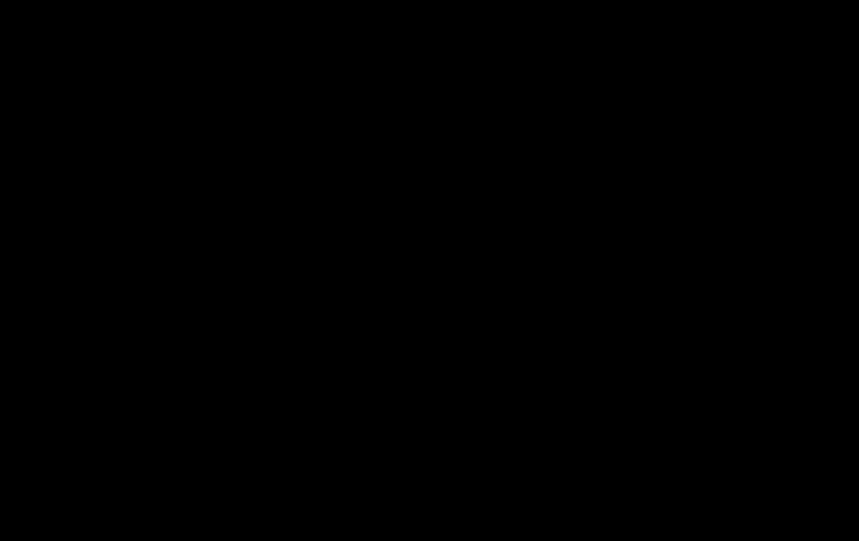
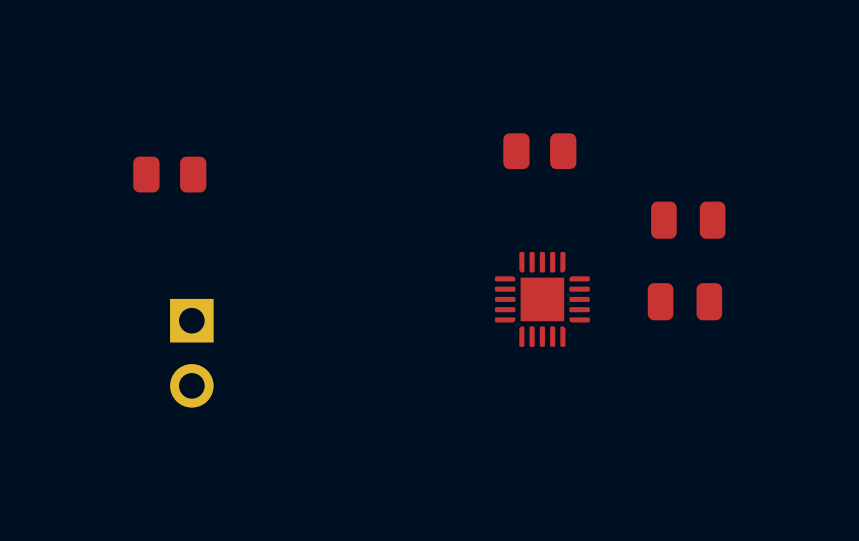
part: none -> (539, 151)
part: none -> (169, 174)
part: none -> (688, 220)
part: none -> (542, 299)
part: none -> (684, 301)
part: none -> (191, 353)

